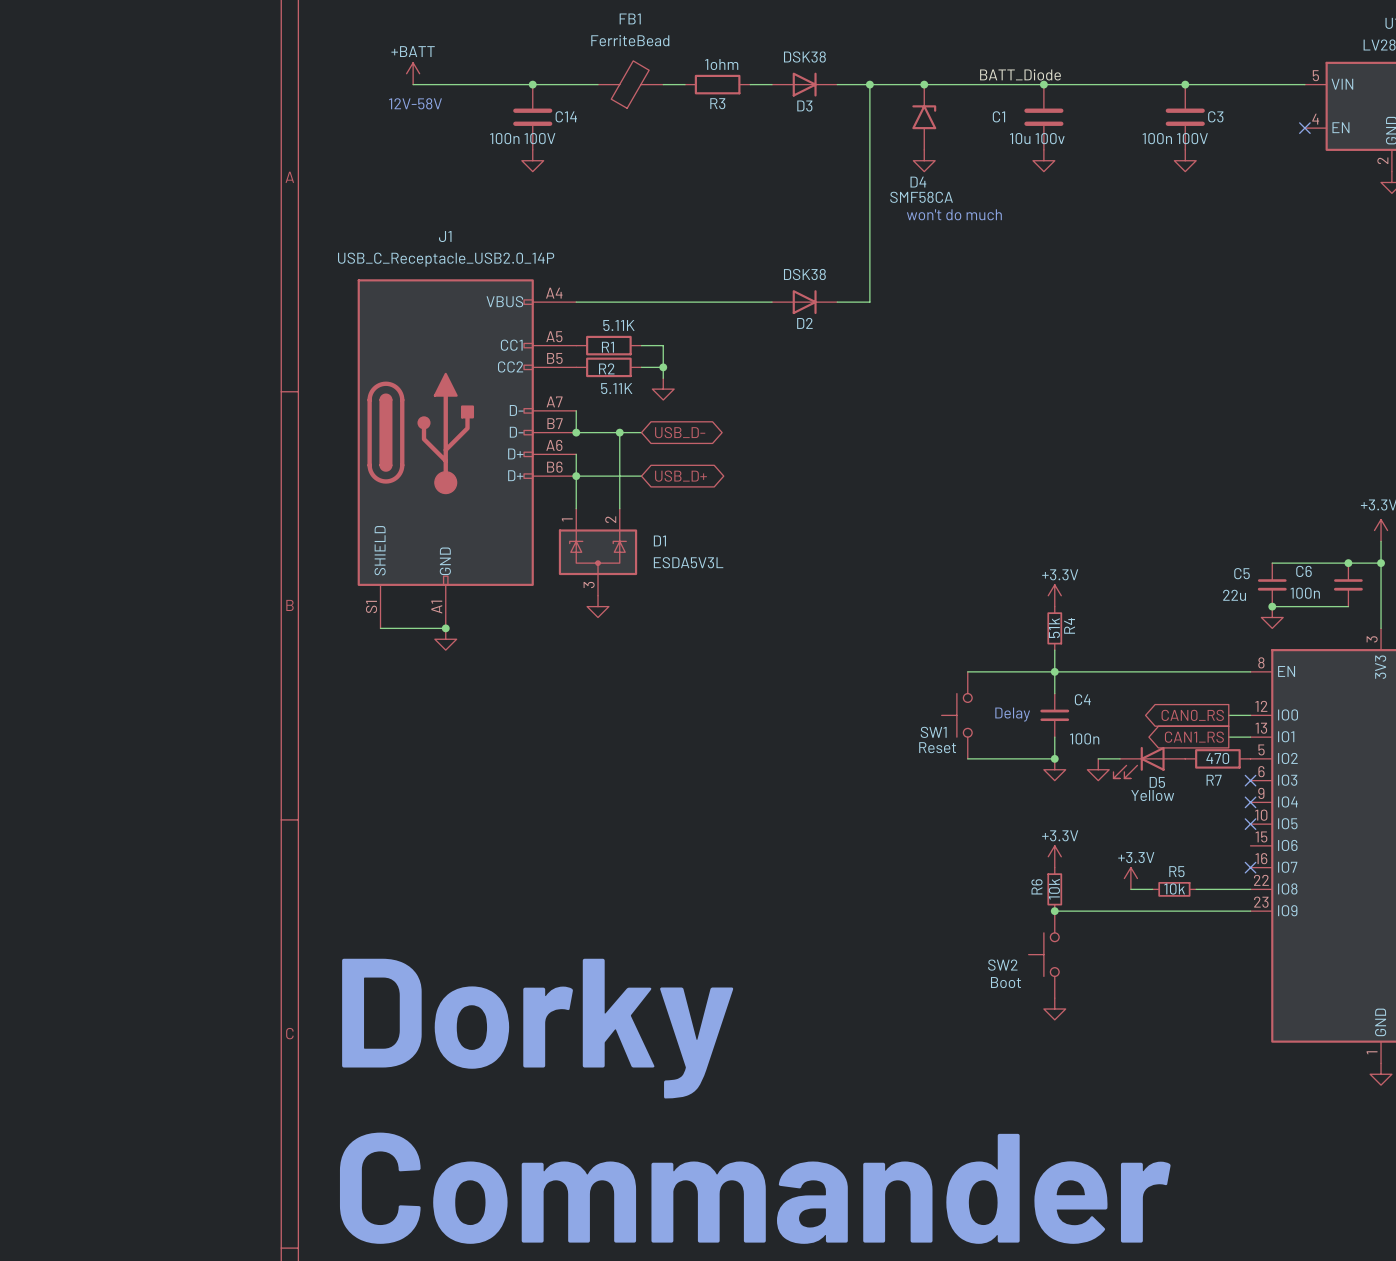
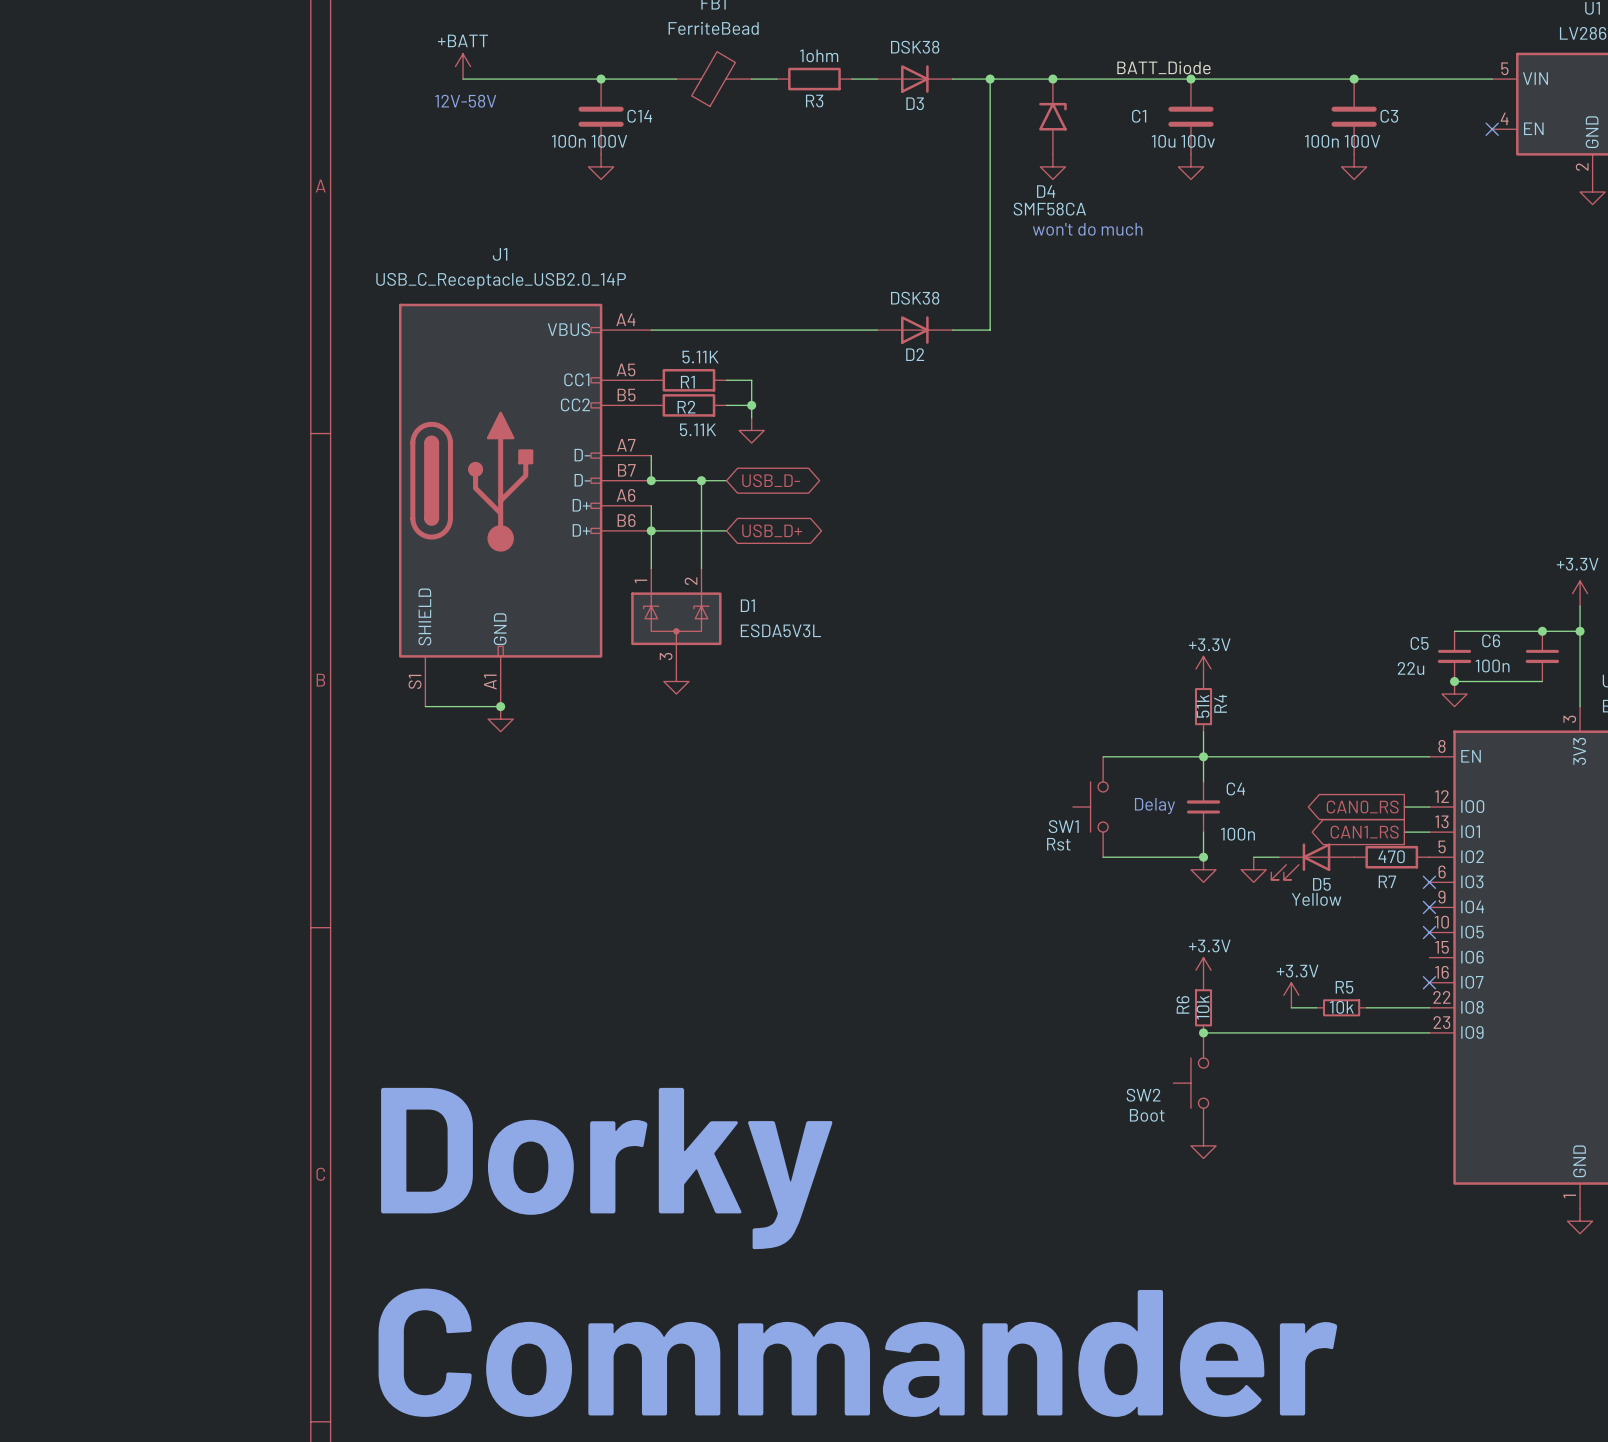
SW1 value: Reset (937, 747) -> Rst (1058, 844)

